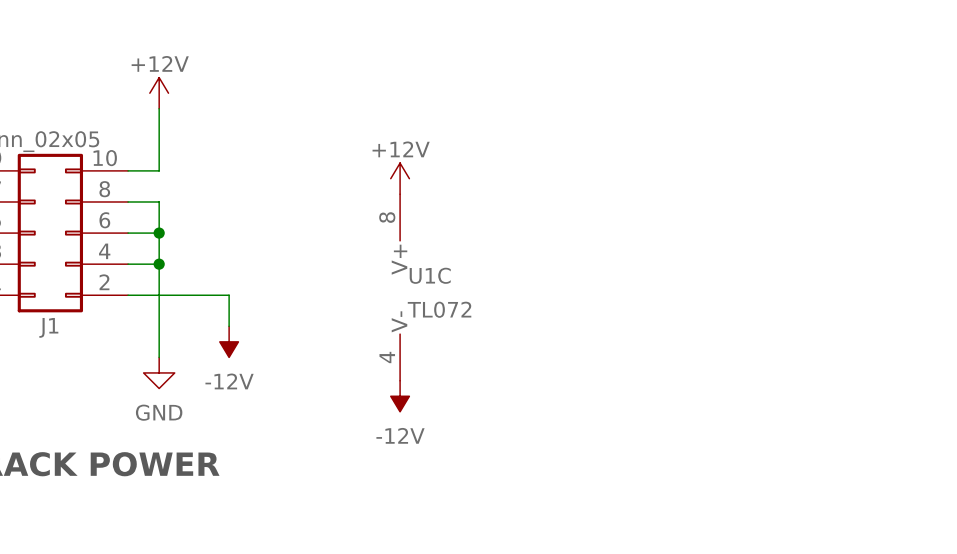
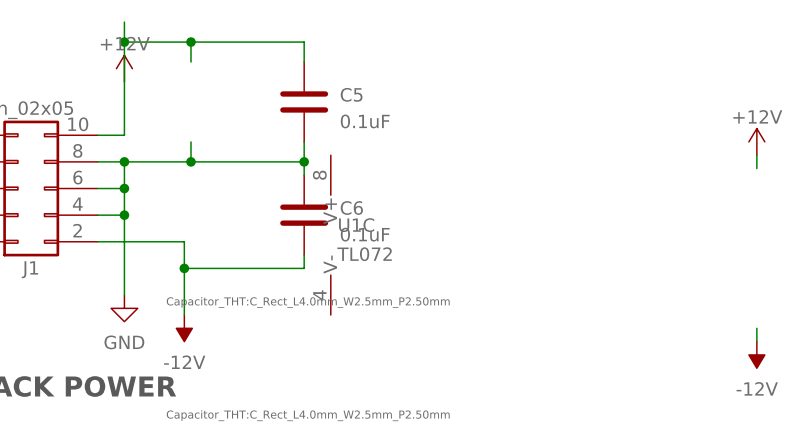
wire: none -> (124, 22) (124, 82)
wire: none -> (124, 42) (304, 42) (304, 62)
junction: none -> (124, 42)
wire: none -> (190, 42) (190, 62)
junction: none -> (190, 42)
C5: none -> 0.1uF (304, 101)
wire: none -> (190, 141) (190, 161)
wire: none -> (304, 141) (304, 175)
power symbol: +12V (400, 178) -> none
power symbol: none -> +12V (756, 141)
wire: none -> (756, 155) (756, 168)
wire: none -> (124, 161) (304, 161)
junction: none -> (124, 161)
junction: none -> (190, 161)
junction: none -> (304, 161)
C6: none -> 0.1uF (304, 215)
wire: none -> (304, 255) (304, 268) (184, 268) (184, 315)
junction: none -> (184, 268)
power symbol position: -12V (229, 341) -> -12V (184, 328)
power symbol: -12V (400, 396) -> none
wire: none -> (756, 328) (756, 341)
power symbol: none -> -12V (756, 354)

